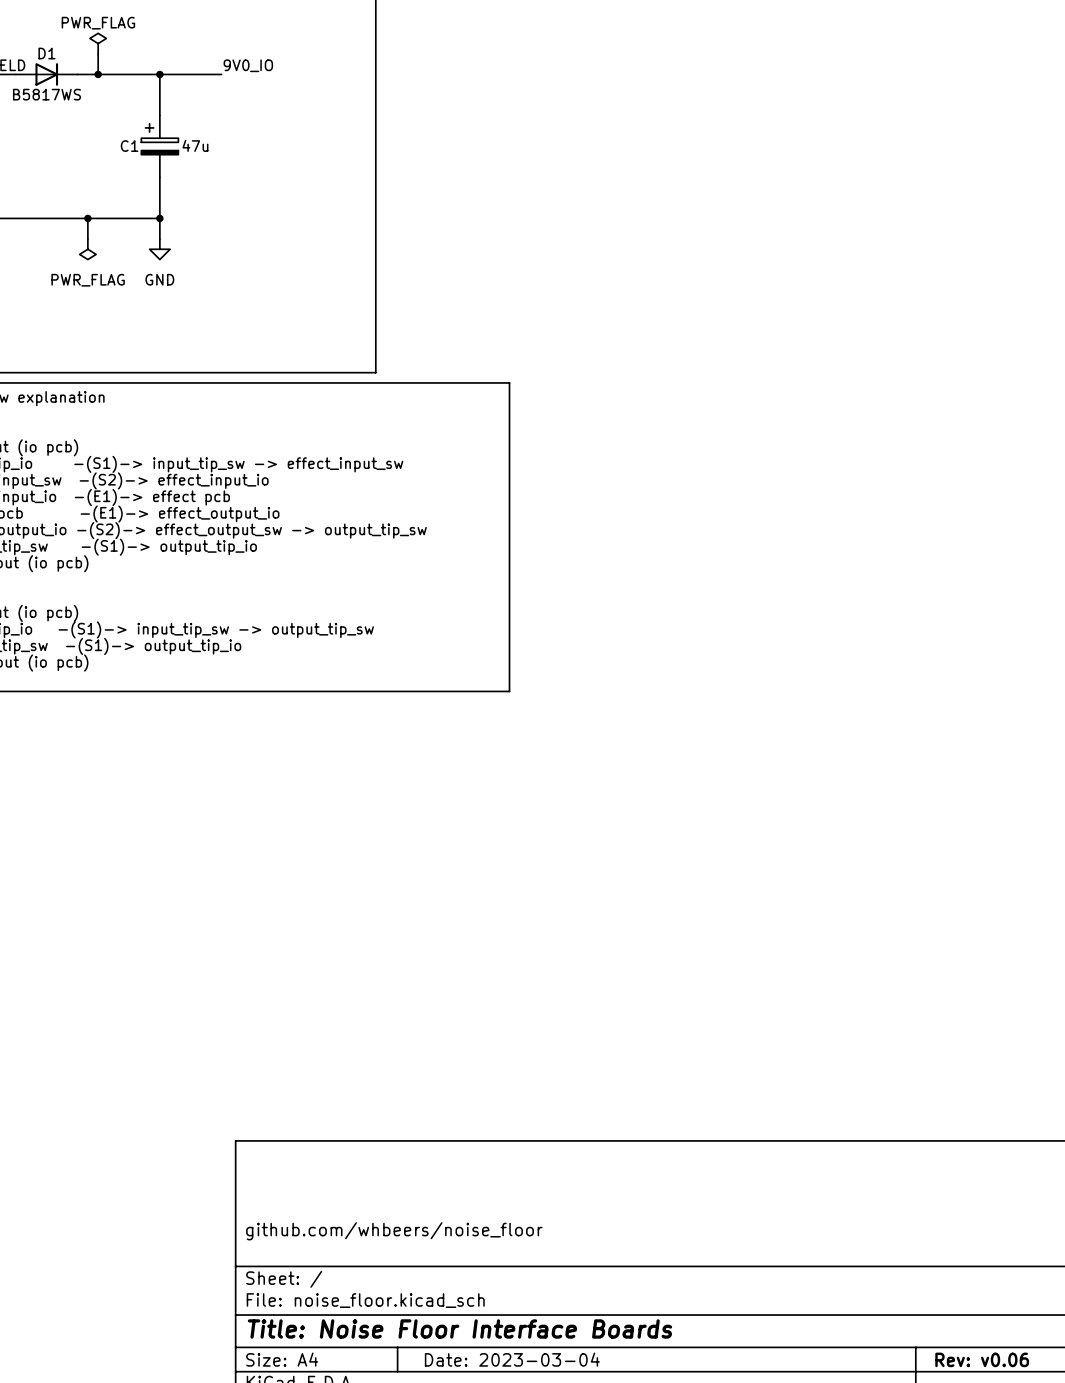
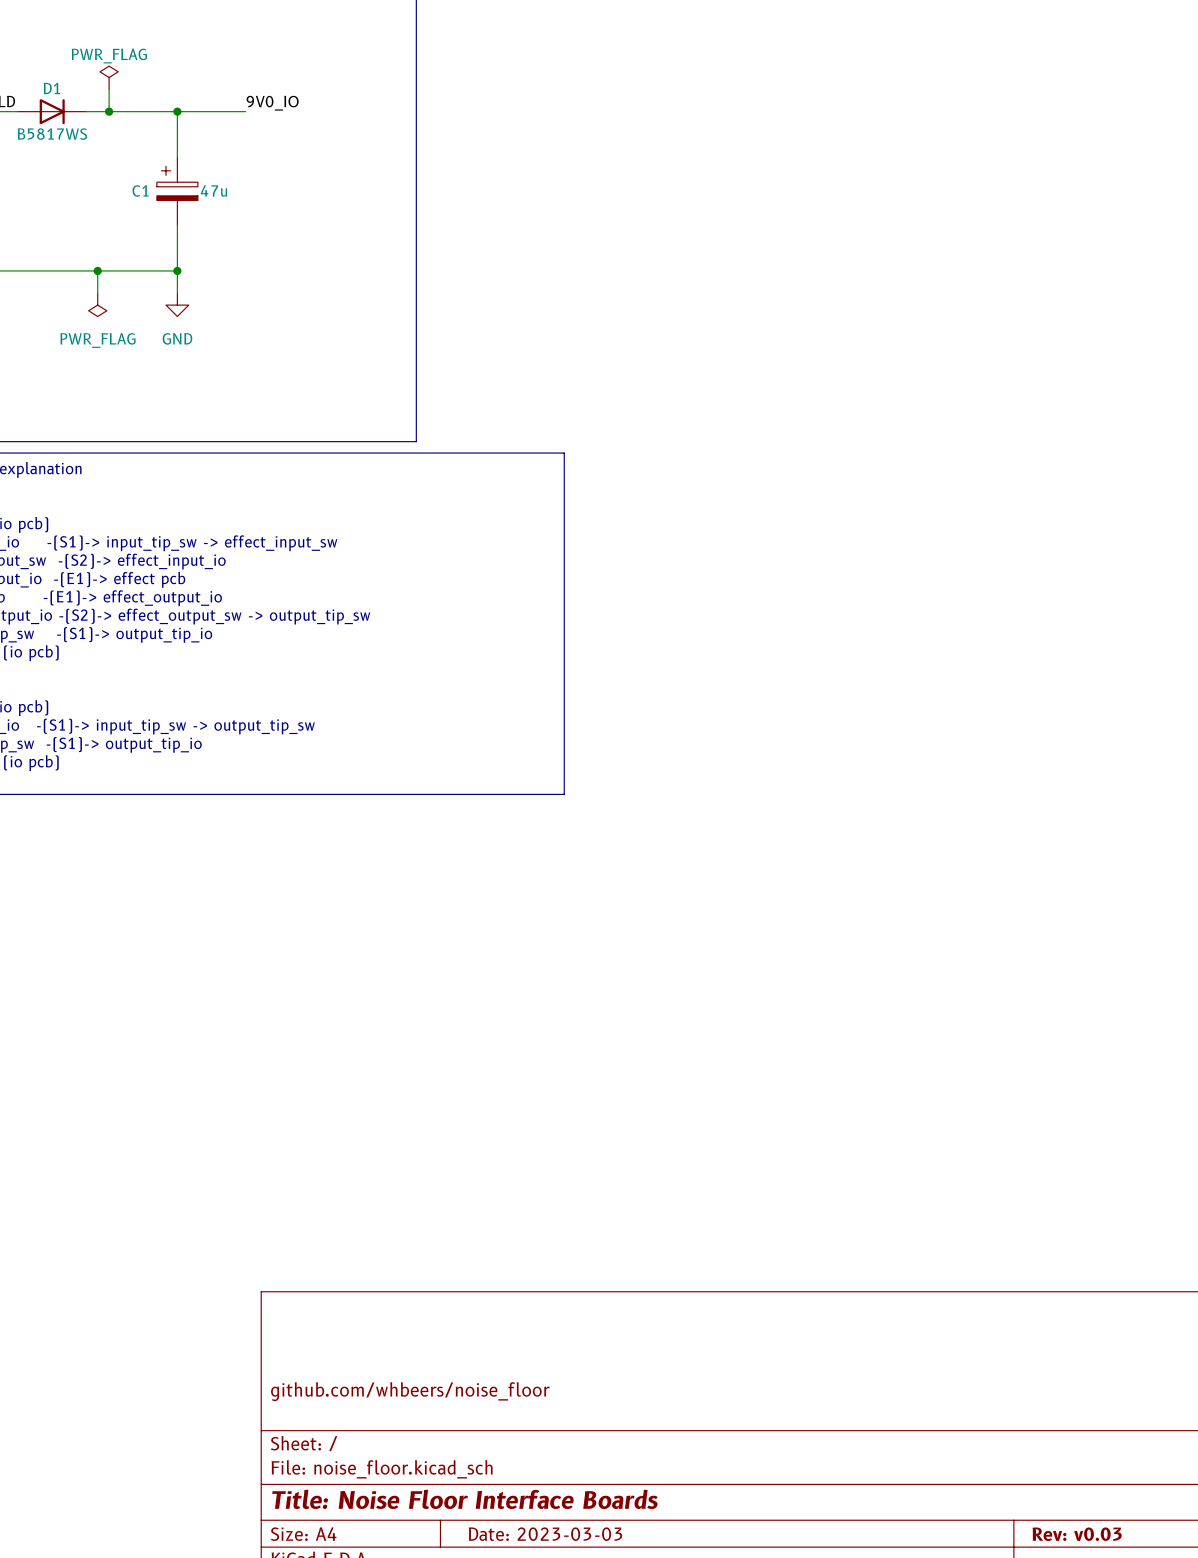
title block: Date: 2023-03-04 (512, 1359) -> Date: 2023-03-03 (545, 1534)
title block: Rev: v0.06 (982, 1359) -> Rev: v0.03 (1077, 1534)

